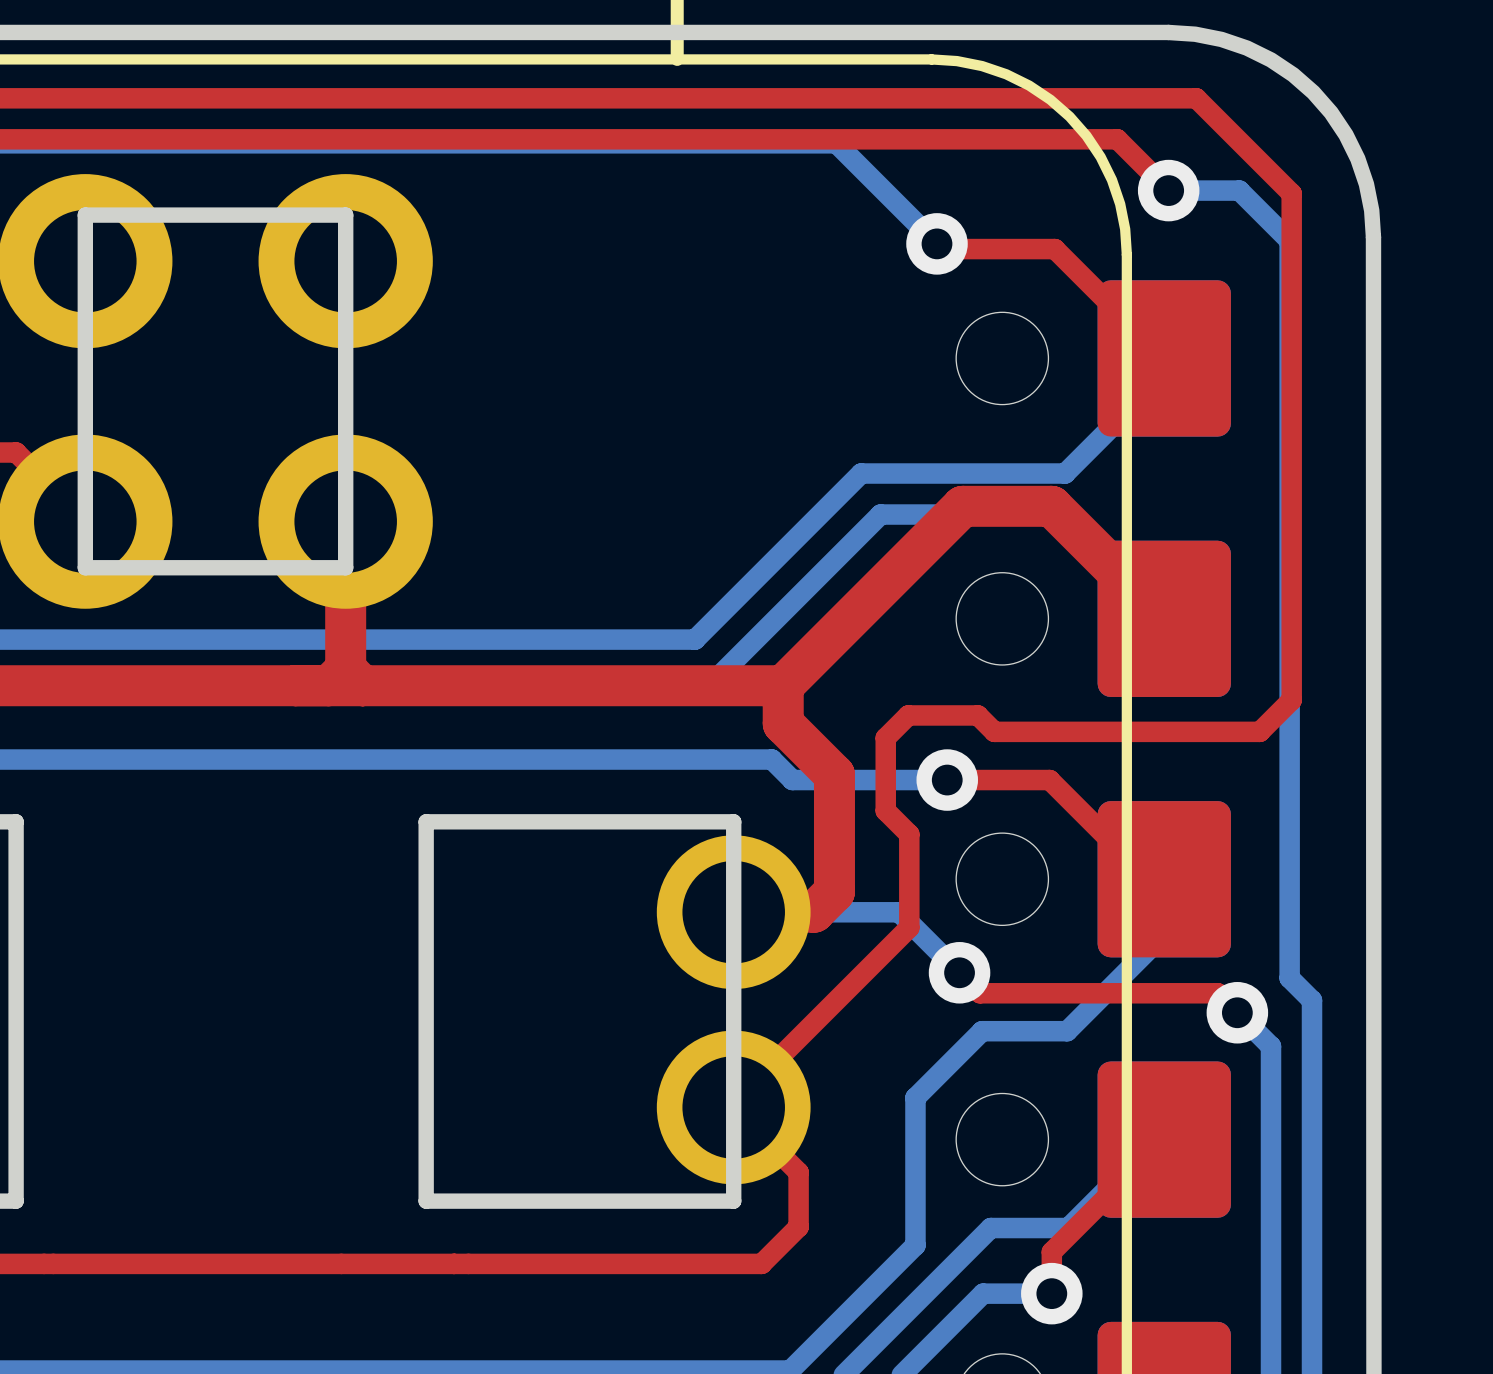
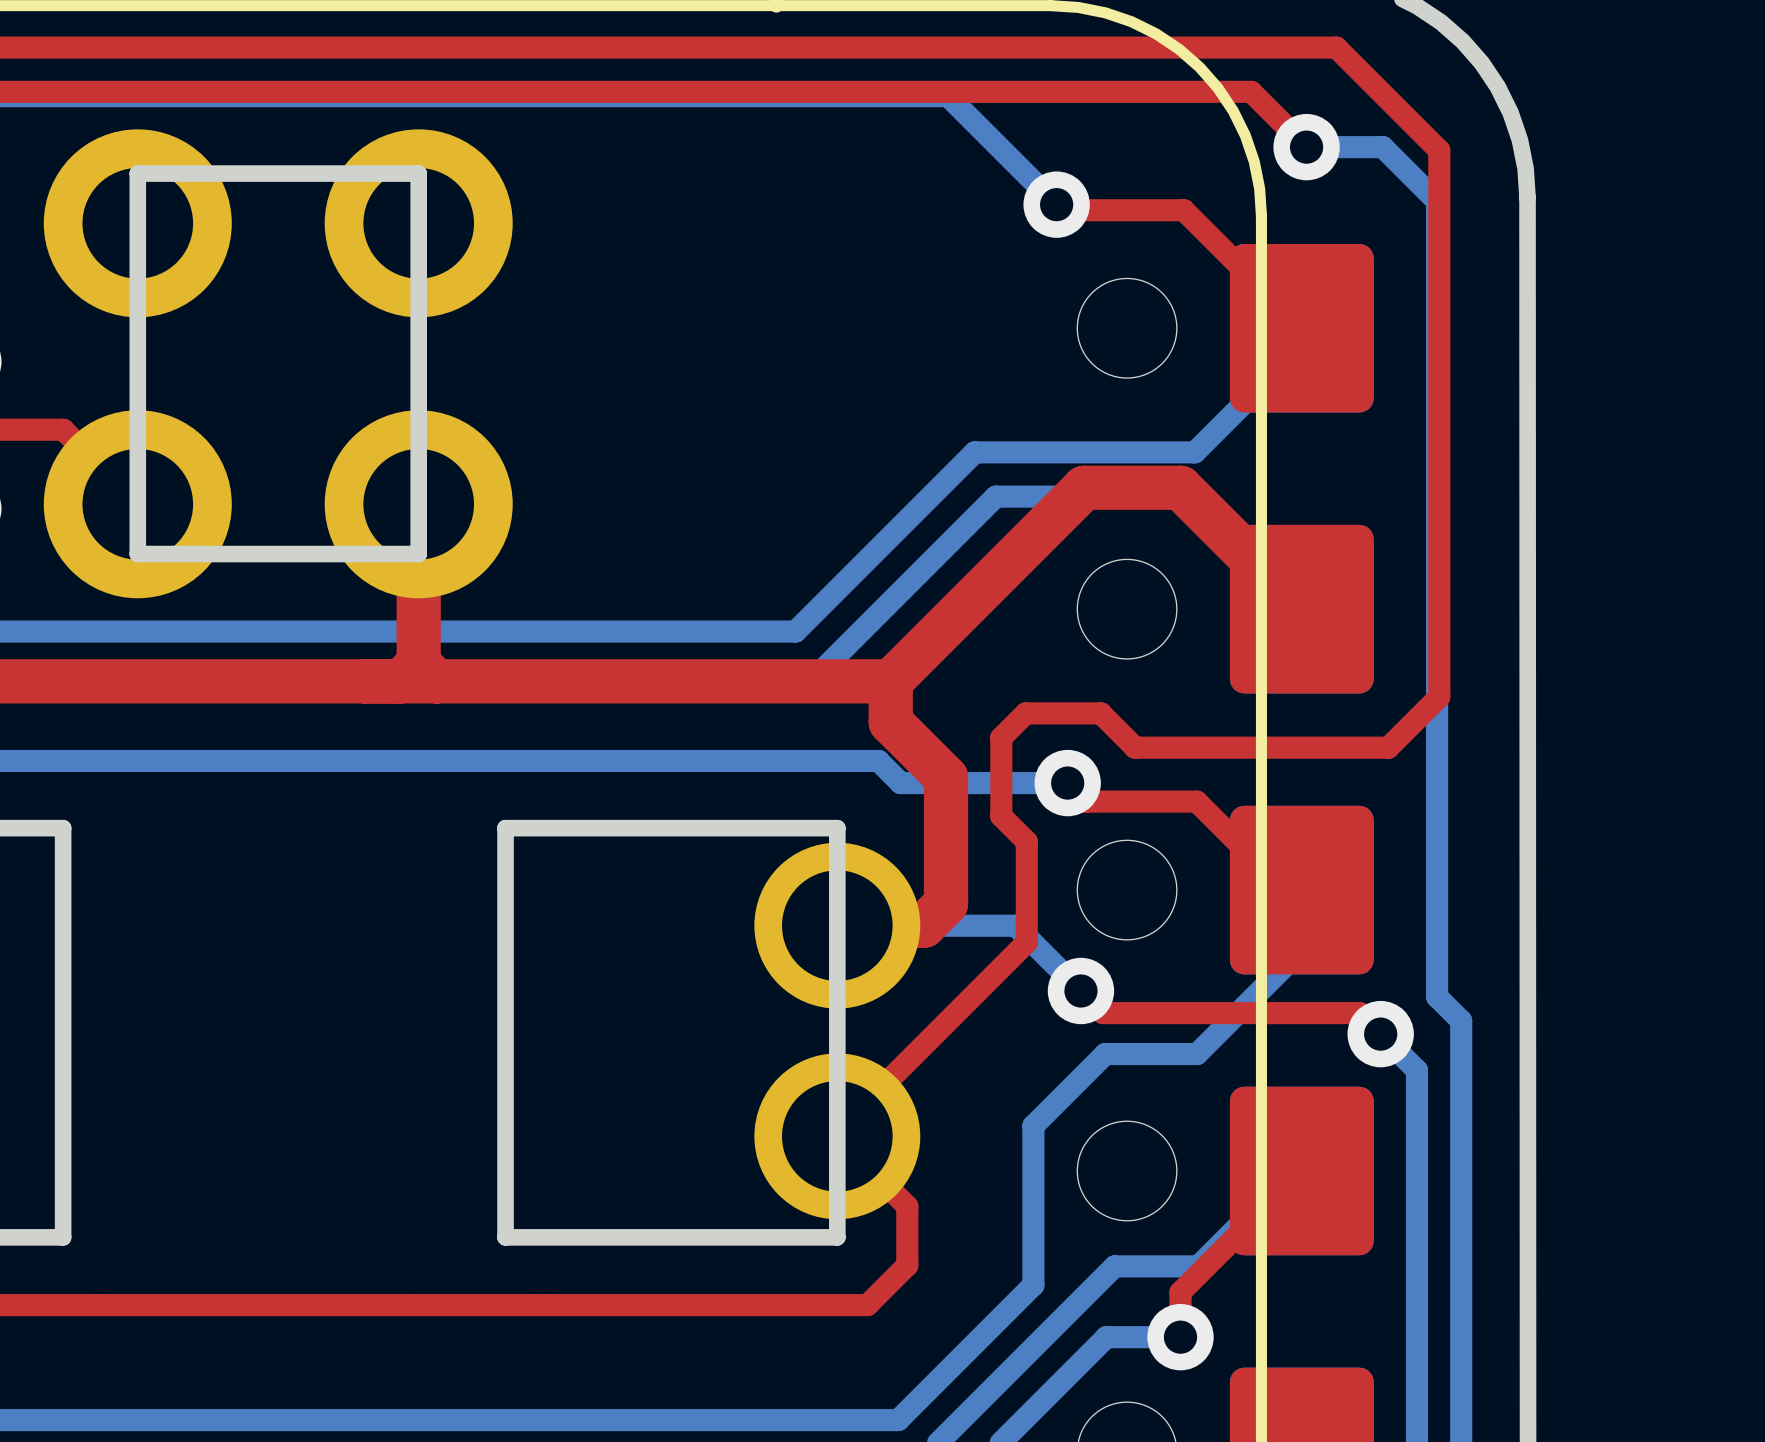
top track: (994, 731) (1259, 731) -> (1118, 731) (1135, 747) (1388, 747) (1405, 731)
top track: (947, 780) (1049, 780) (1066, 797) -> (1067, 783) (1086, 801) (1196, 801)

